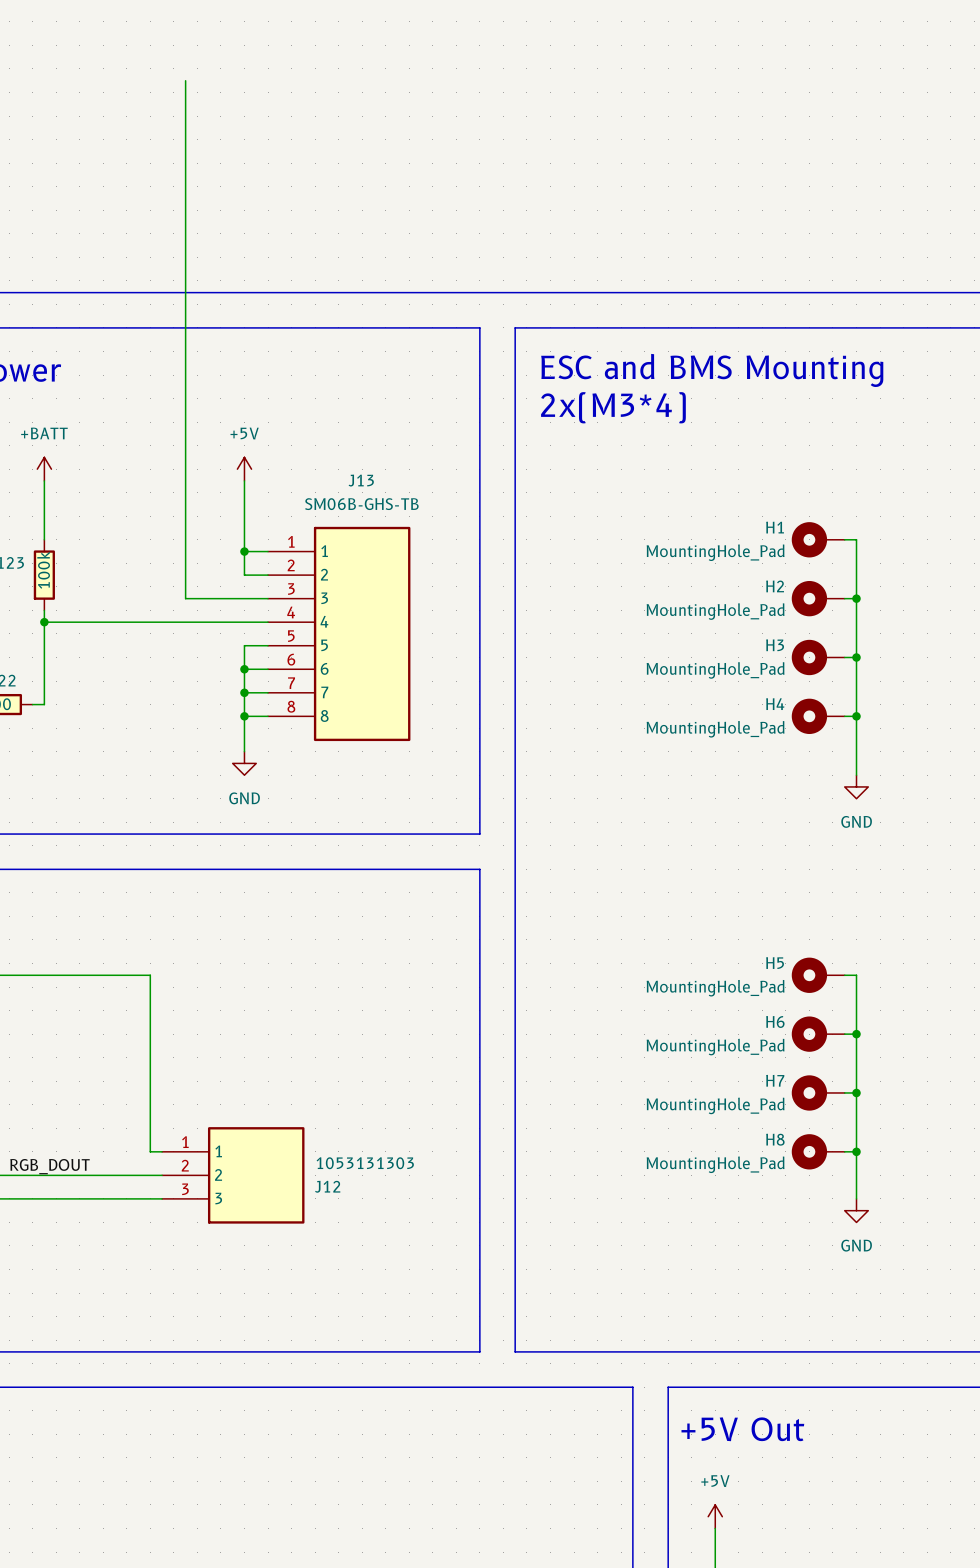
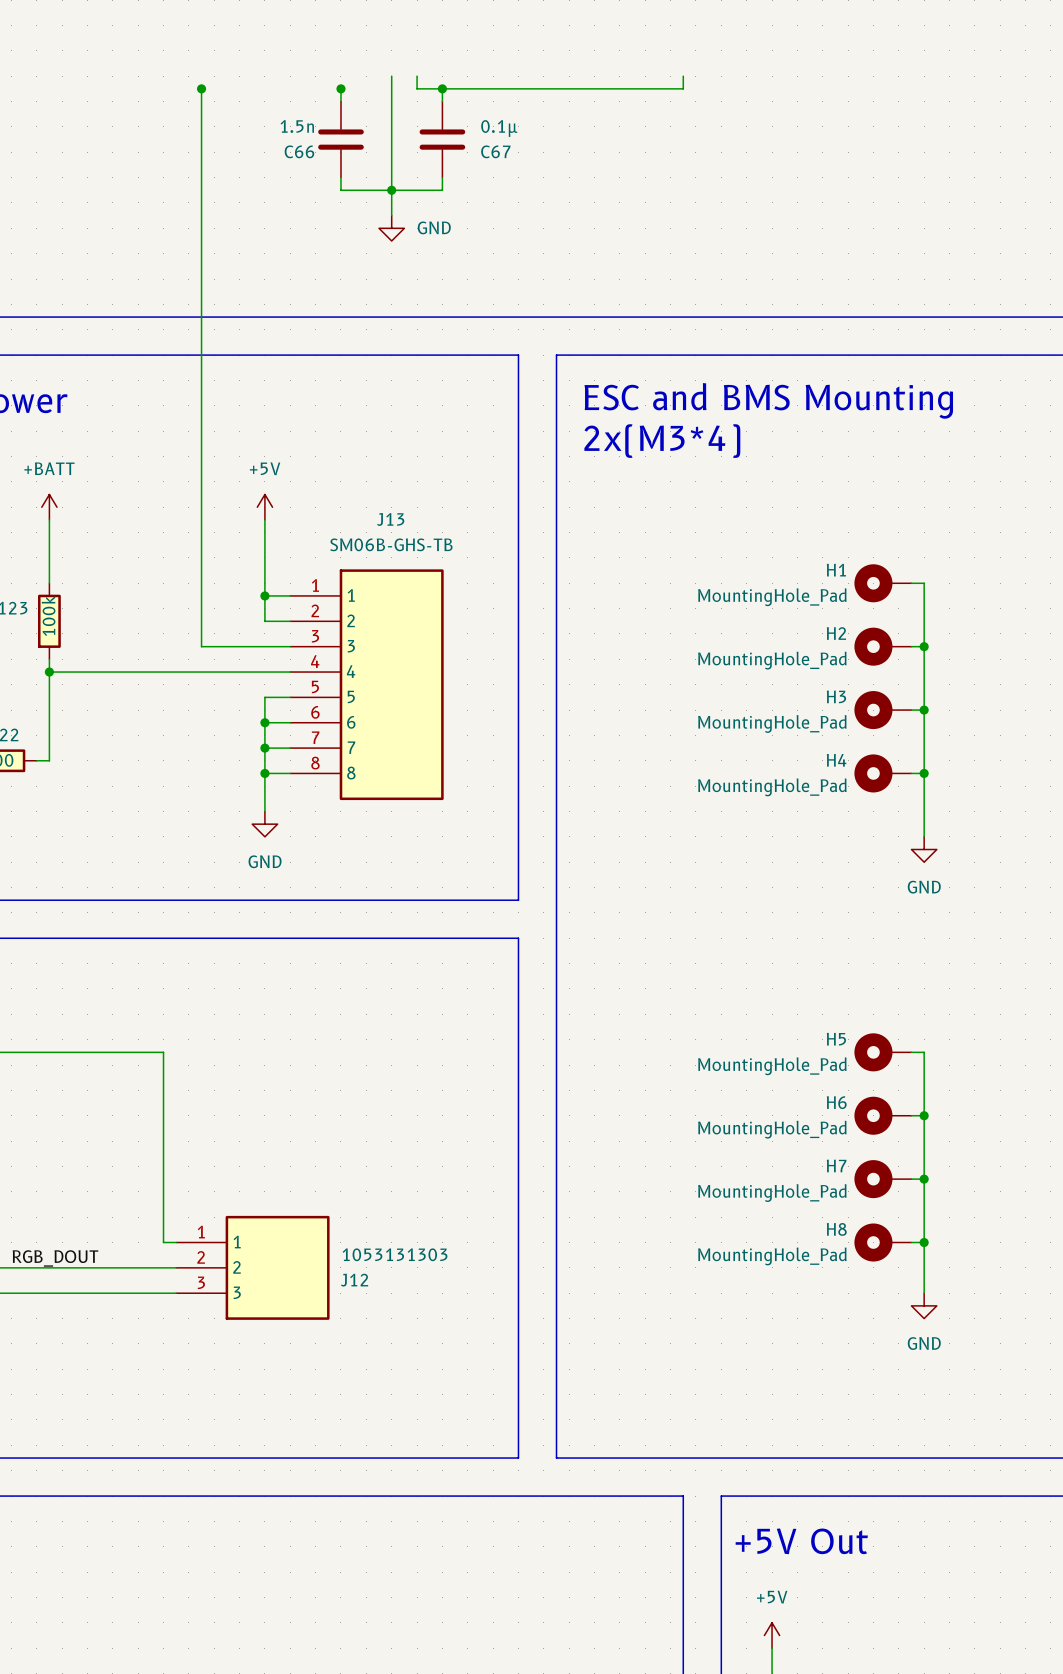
wire: none -> (391, 76) (391, 215)
wire: none -> (417, 76) (417, 88) (683, 88) (683, 76)
junction: none -> (201, 88)
wire: none -> (340, 88) (340, 101)
junction: none -> (340, 88)
wire: none -> (442, 88) (442, 101)
junction: none -> (442, 88)
C66: none -> 1.5n (340, 139)
C67: none -> 0.1µ (442, 139)
wire: none -> (340, 177) (340, 190) (442, 190) (442, 177)
junction: none -> (391, 190)
power symbol: none -> GND (391, 228)

